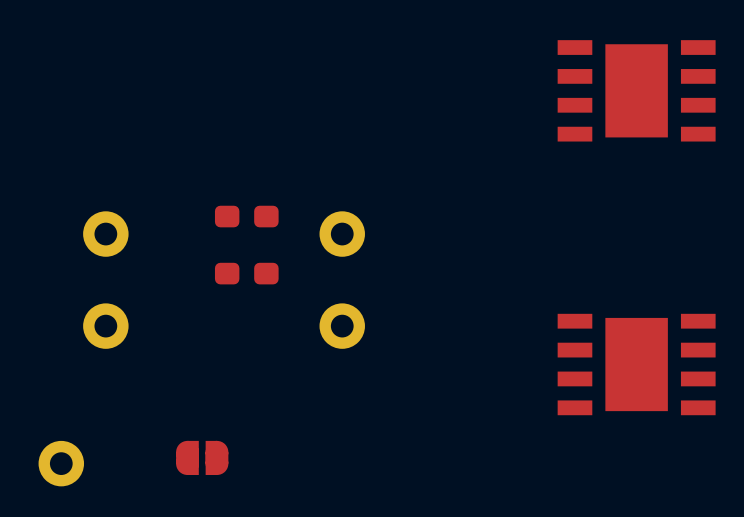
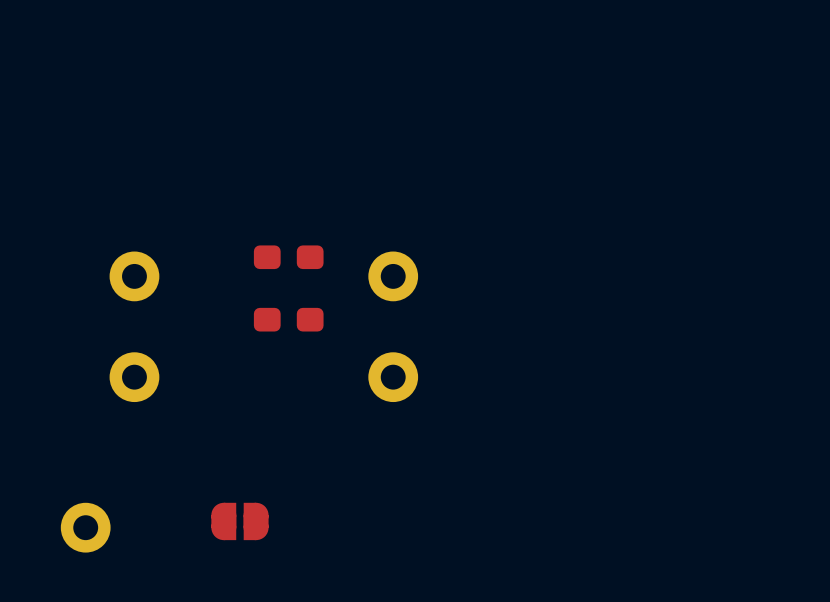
part: (636, 90) -> none
part: (636, 364) -> none

